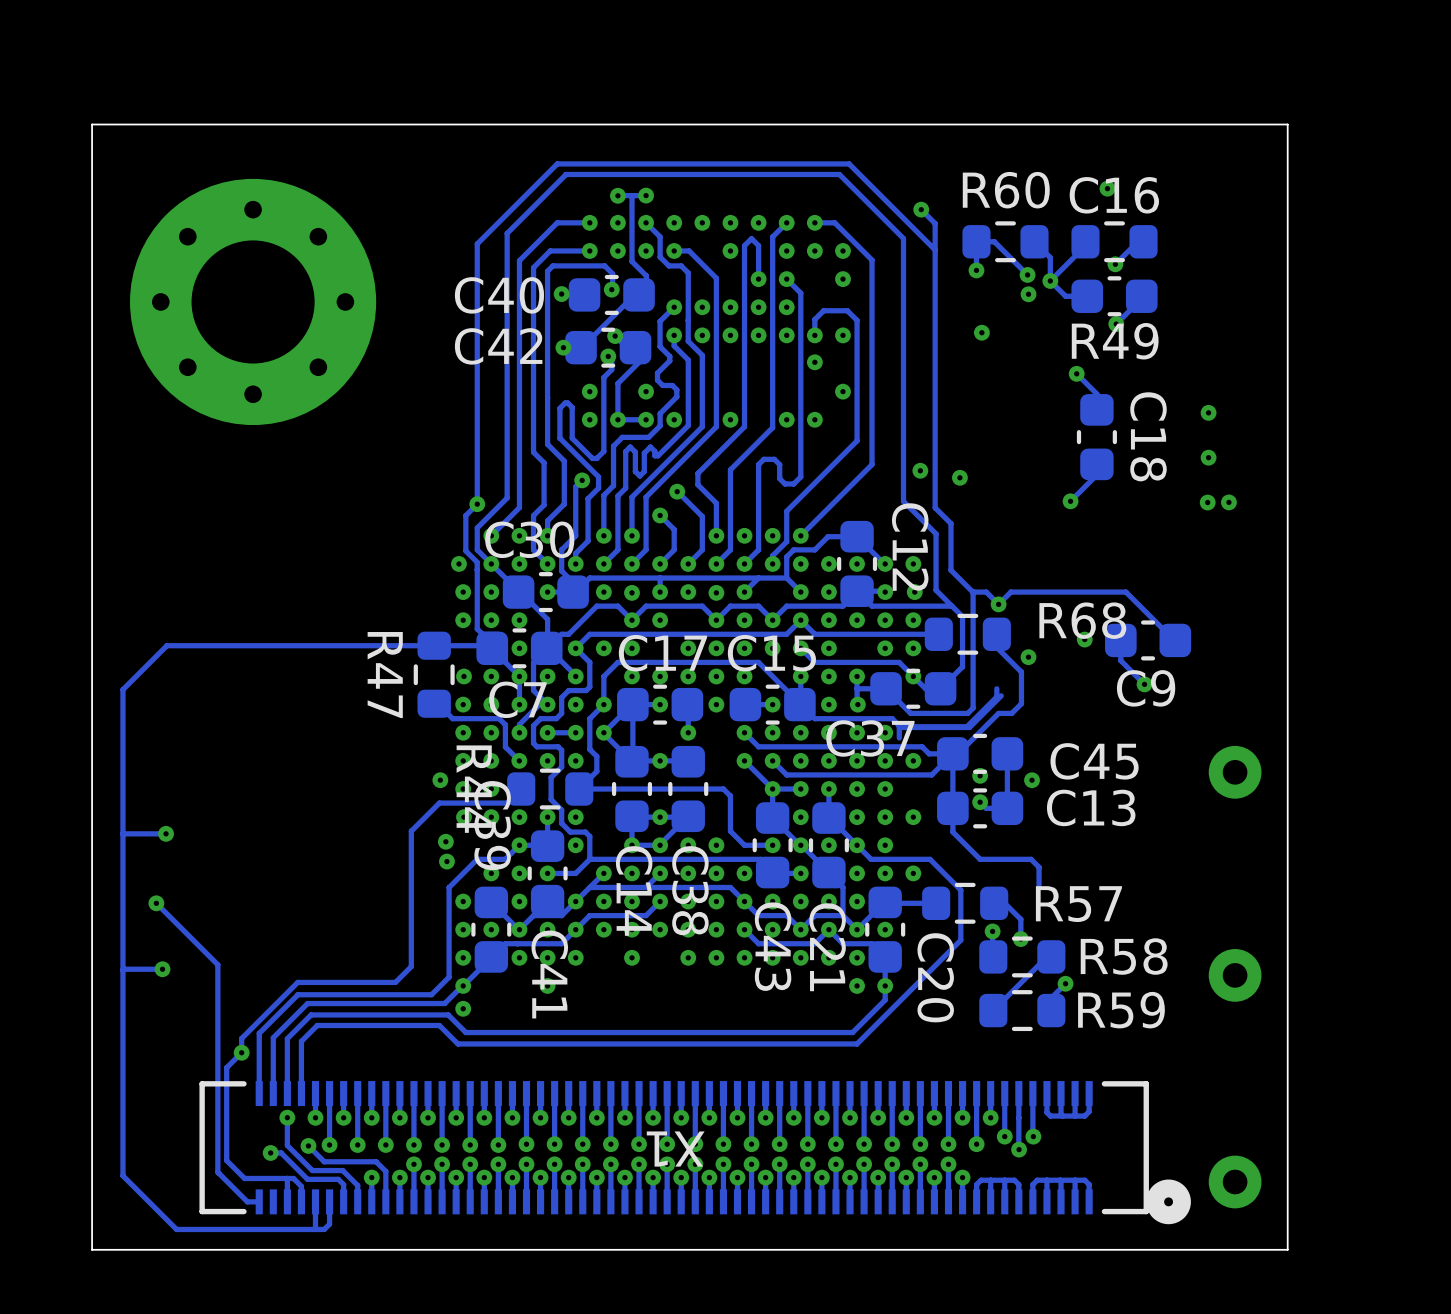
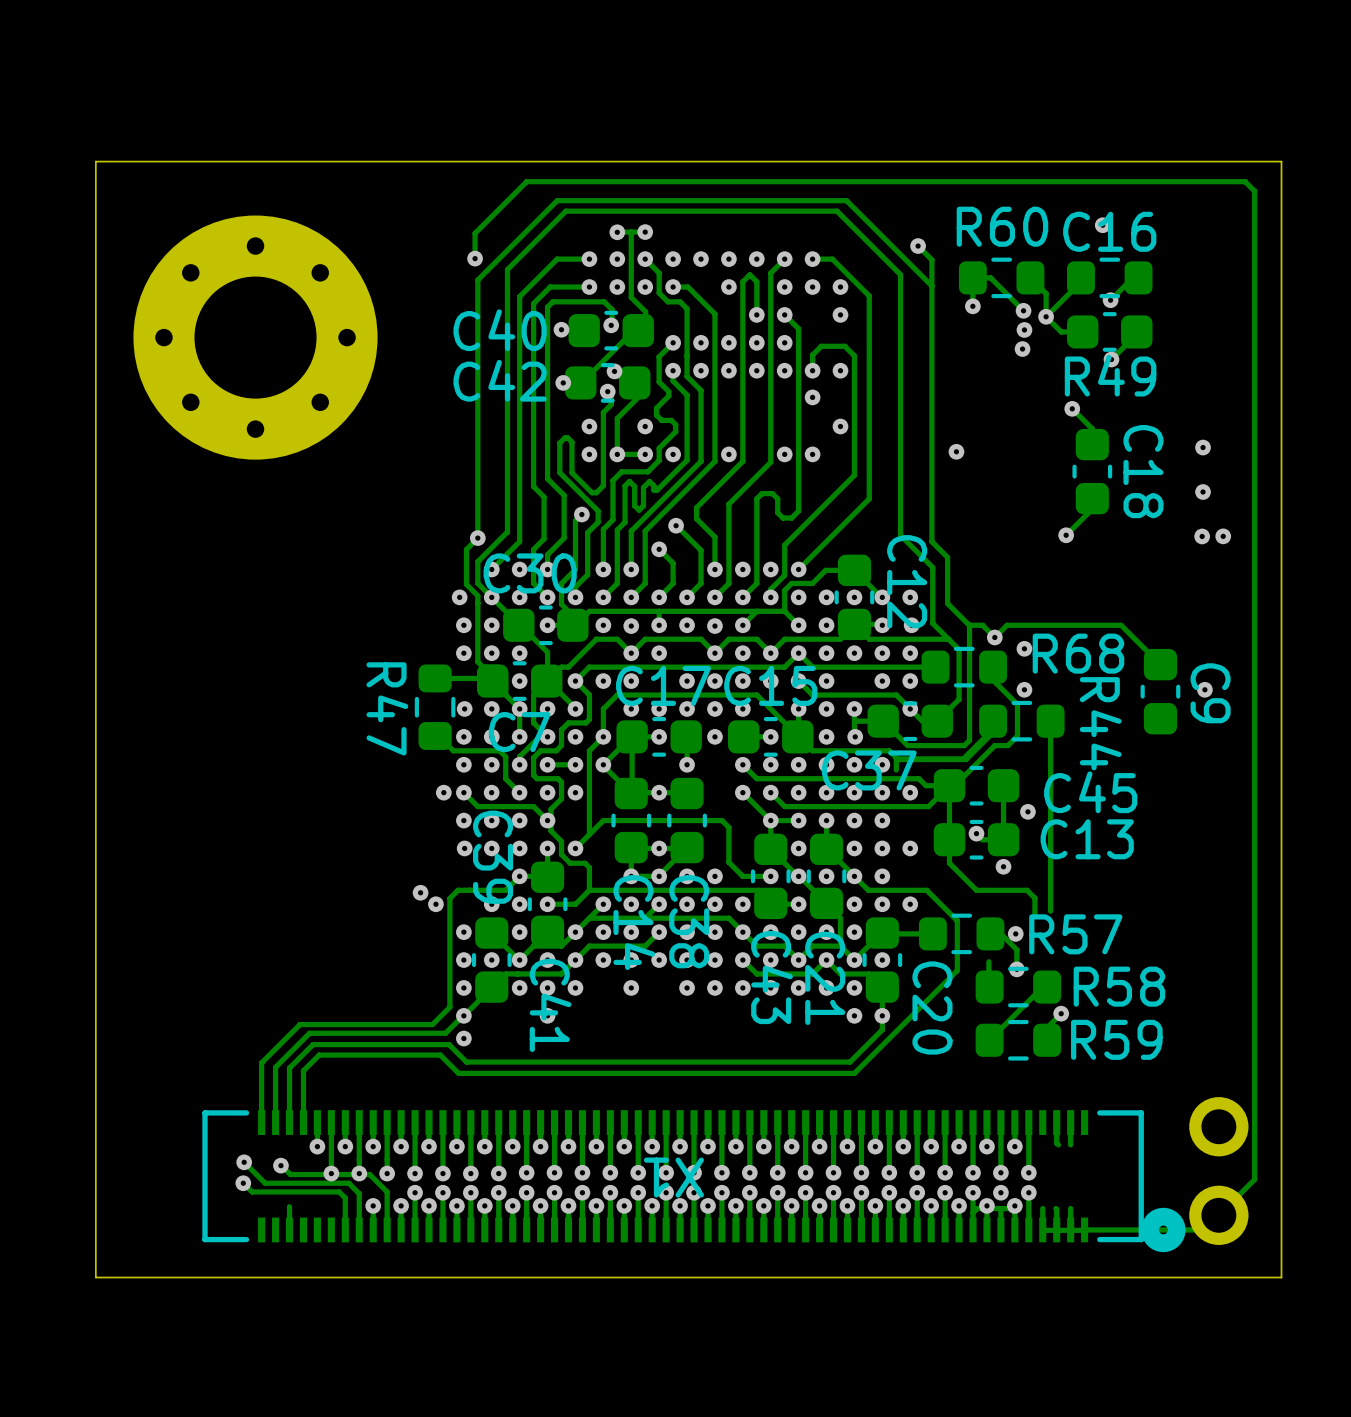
track: none -> (475, 258) (475, 233) (526, 181) (1245, 181) (1254, 191) (1254, 1179) (1204, 1229) (1084, 1229)
via: none -> (475, 258)
via: none -> (1022, 349)
via: (981, 332) -> none
via: none -> (956, 451)
via: (920, 470) -> none
via: (959, 477) -> none
via position: (1084, 639) -> (1024, 648)
track: (1120, 640) (1120, 660) (1144, 684) -> none
C9 rotation: 0° (1148, 640) -> 90° clockwise (1160, 691)
track: (434, 645) (166, 645) (122, 689) (122, 1175) (176, 1229) (324, 1229) (329, 1224) (329, 1201) -> none
via: none -> (1204, 689)
via: (1144, 684) -> none
track: none -> (1050, 721) (1050, 911)
track: (589, 749) (596, 756) (596, 771) (579, 789) (603, 789) -> (589, 781) (589, 834)
track: none -> (463, 792) (477, 806) (533, 806) (547, 820)
part: (1235, 772) -> none
via: (980, 775) -> none
via position: (440, 780) -> (443, 792)
R44 name position: R44 (474, 789) -> R44 (1100, 723)
via: none -> (519, 820)
track: (521, 789) (507, 803) (439, 803) (411, 831) (411, 966) (395, 982) (297, 982) (241, 1038) (241, 1052) (226, 1067) (226, 1160) (244, 1178) (293, 1178) (301, 1186) (301, 1201) -> none
via: none -> (547, 820)
R44 position: (550, 789) -> (1021, 721)
track: none -> (603, 820) (575, 848)
track: (166, 833) (122, 833) -> none
via: (166, 833) -> none
via: none -> (1003, 866)
via: (445, 841) -> none
via: (575, 845) -> none
track: (477, 859) (449, 887) -> (477, 890) (458, 890) (449, 898) (449, 918)
via: none -> (420, 892)
via position: (446, 861) -> (435, 904)
track: (156, 903) (217, 964) (217, 1172) (247, 1201) (259, 1201) -> none
via: (156, 903) -> none
via position: (992, 931) -> (1015, 933)
track: (162, 969) (122, 970) -> none
via: (162, 969) -> none
part: (1235, 975) -> none
via: (241, 1052) -> none
track: (1089, 1093) (1089, 1111) (1084, 1116) (1050, 1116) (1046, 1112) (1046, 1093) -> none
track: (287, 1117) (287, 1145) (312, 1170) (342, 1170) (357, 1185) -> (244, 1162) (265, 1183) (348, 1183) (359, 1193) (359, 1213)
via: (287, 1117) -> none
track: (1018, 1117) (1018, 1149) -> none
via: none -> (1014, 1146)
via: none -> (244, 1162)
via: none -> (280, 1165)
via: (1004, 1136) -> none
via: (1033, 1136) -> none
part: none -> (1218, 1171)
via: none -> (1000, 1172)
via: none -> (1028, 1172)
track: (308, 1145) (324, 1161) (376, 1161) (385, 1171) -> (281, 1165) (290, 1174) (369, 1174) (387, 1191) (387, 1199)
via: (308, 1145) -> none
via: (1019, 1149) -> none
track: (270, 1152) (281, 1152) (307, 1179) (338, 1179) (343, 1184) -> (243, 1183) (252, 1191) (339, 1191) (345, 1198) (345, 1212)
via: (270, 1152) -> none
via: none -> (243, 1183)
track: none -> (973, 1192) (973, 1212)
via: none -> (973, 1192)
via: none -> (1000, 1192)
track: none -> (1028, 1192) (1028, 1212)
via: none -> (1028, 1192)
via: none -> (986, 1205)
via: none -> (1014, 1205)
part: (1235, 1181) -> none
track: (1032, 1184) (1037, 1180) (1084, 1180) (1089, 1184) (1089, 1201) -> (1042, 1230) (1084, 1230)
track: (315, 1201) (314, 1229) -> none

